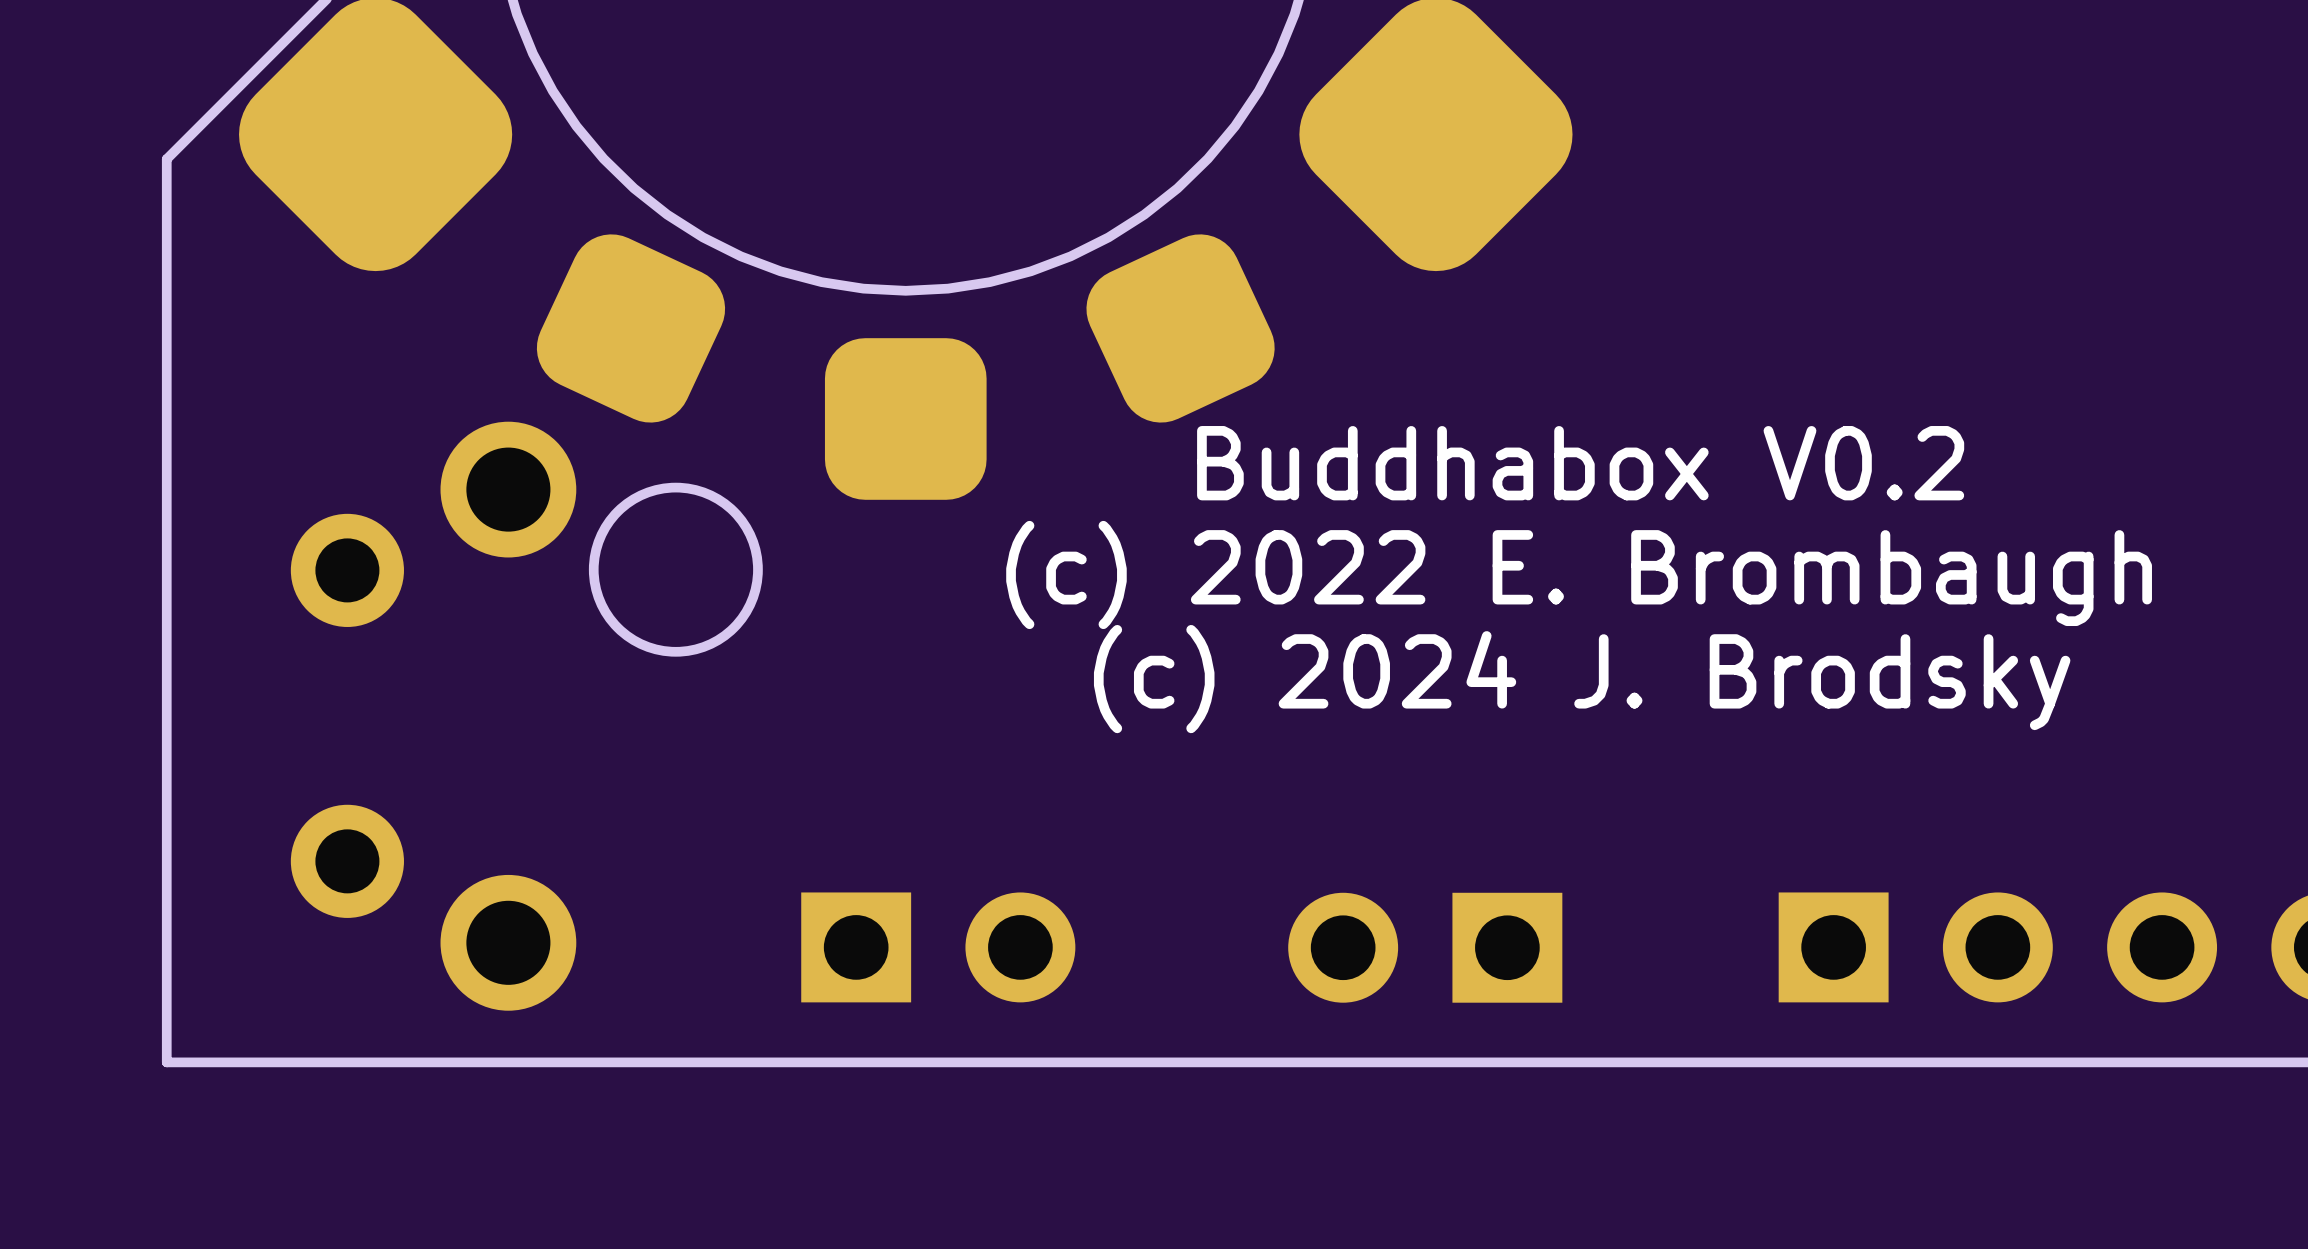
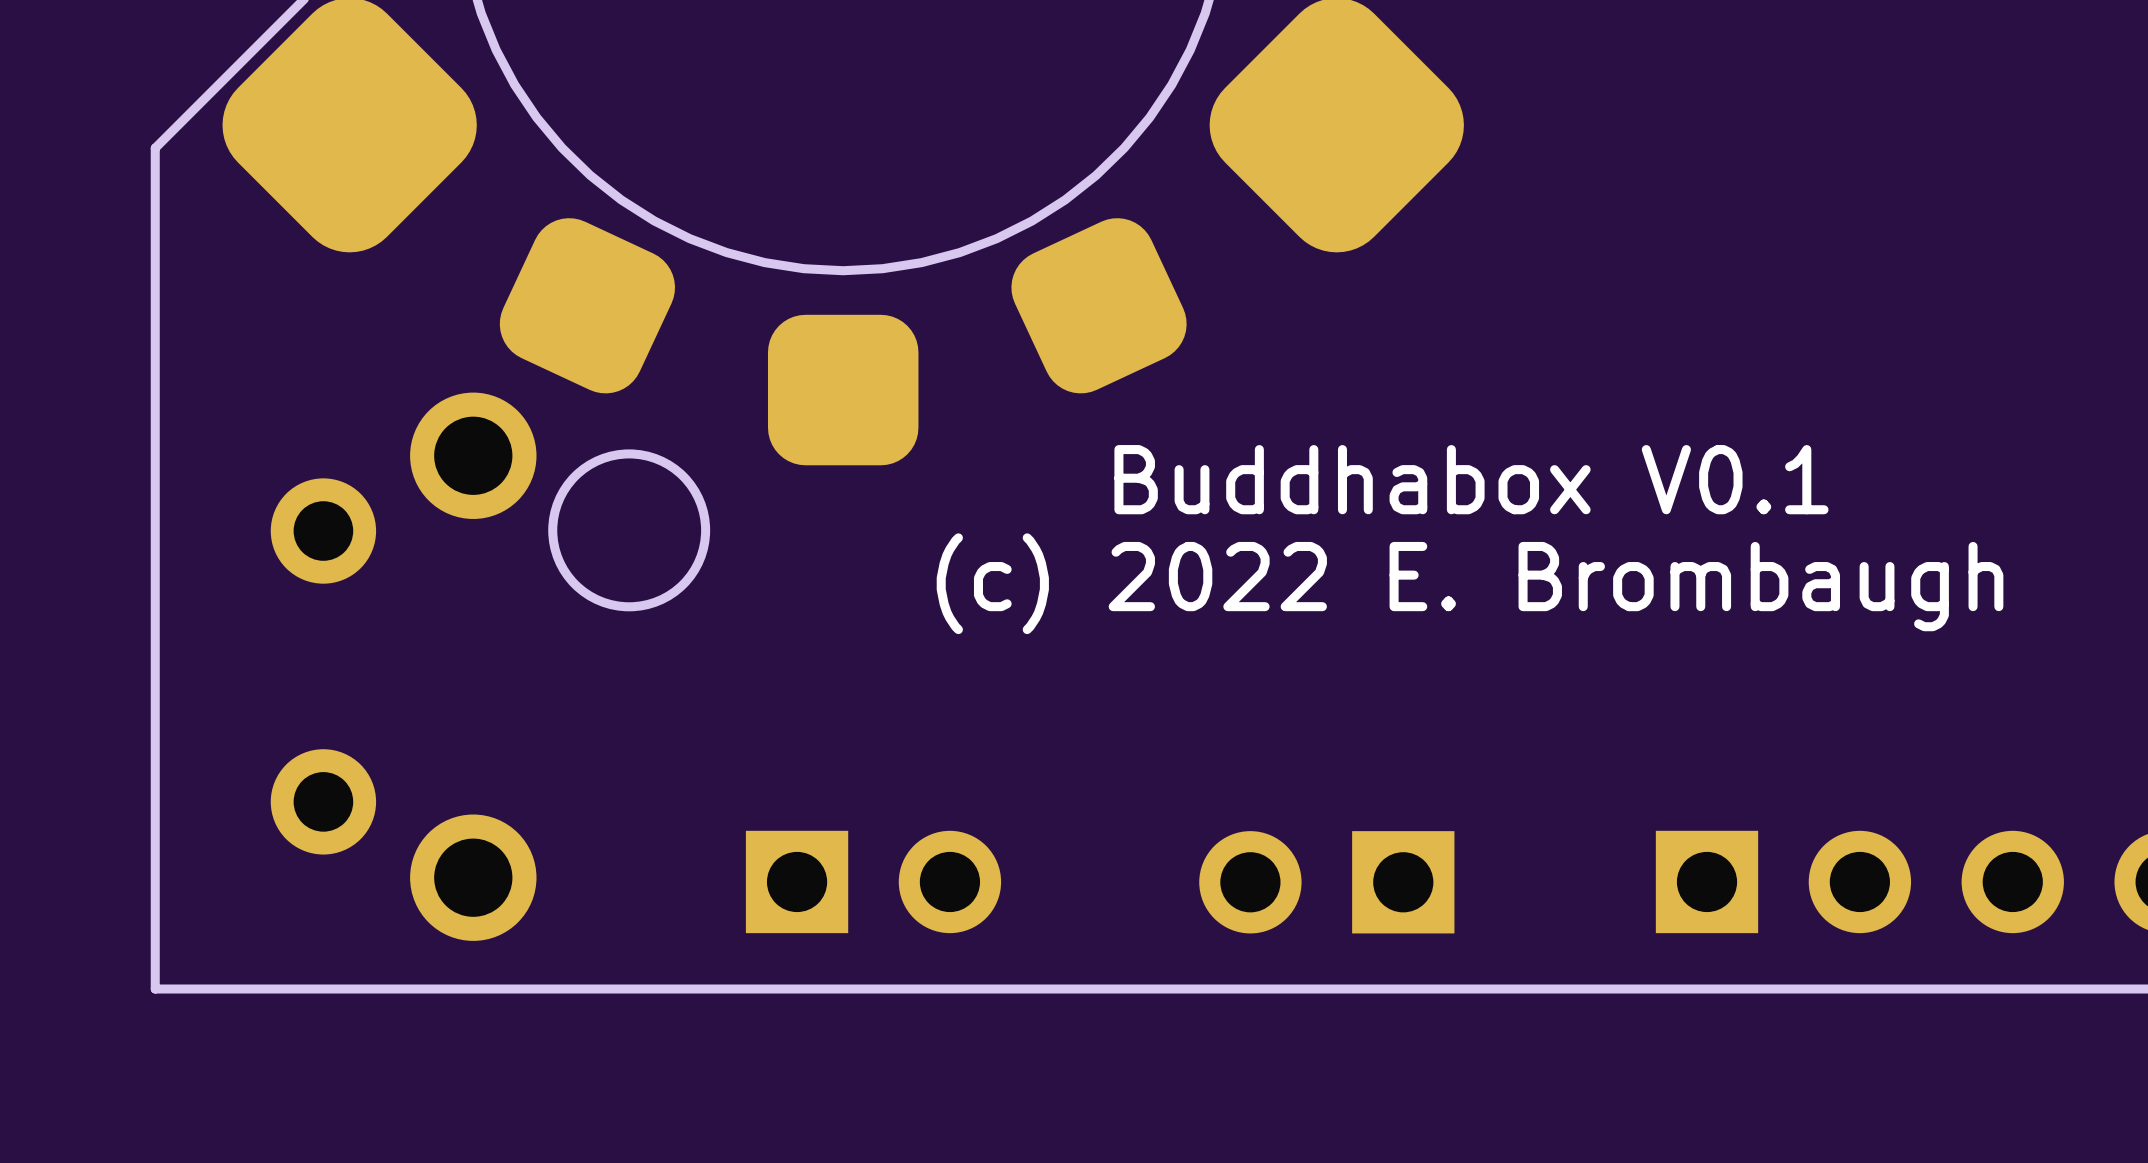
text: Buddhabox V0.2 (1580, 463) -> Buddhabox V0.1 (1471, 479)
text position: (c) 2022 E. Brombaugh (1579, 574) -> (c) 2022 E. Brombaugh (1470, 583)
text: (c) 2024 J. Brodsky (1582, 679) -> none

